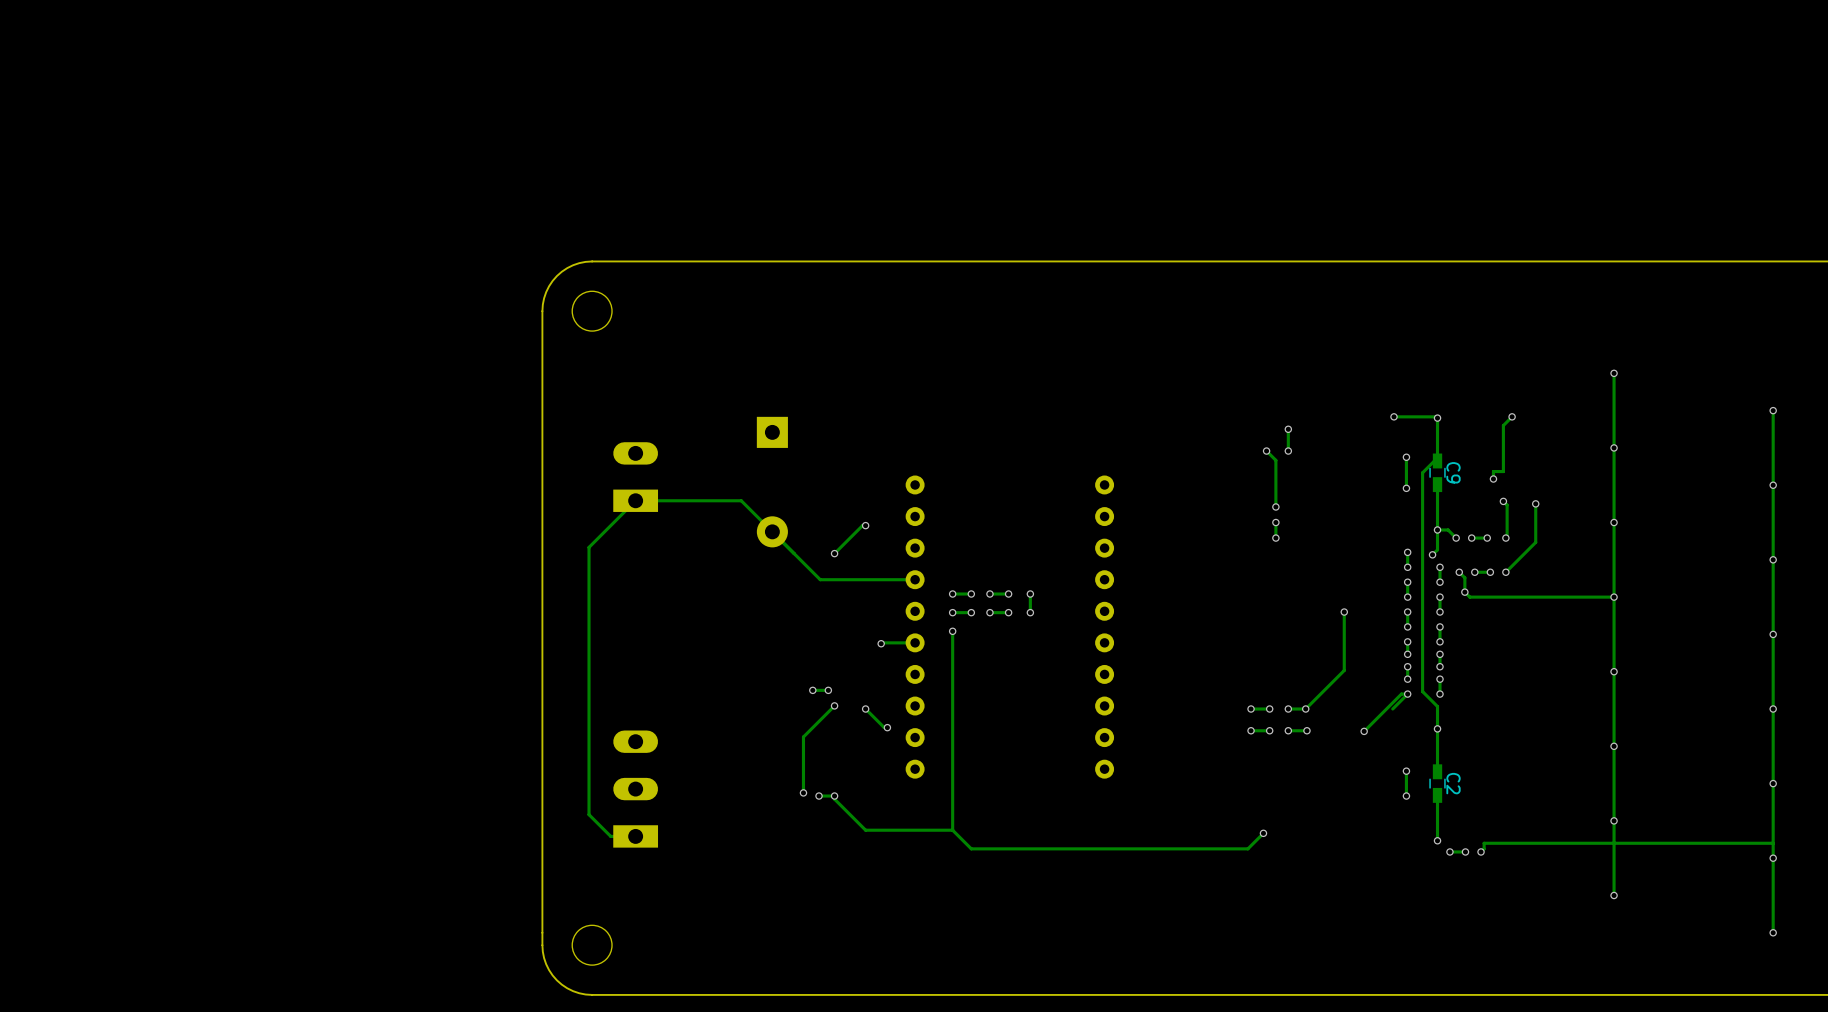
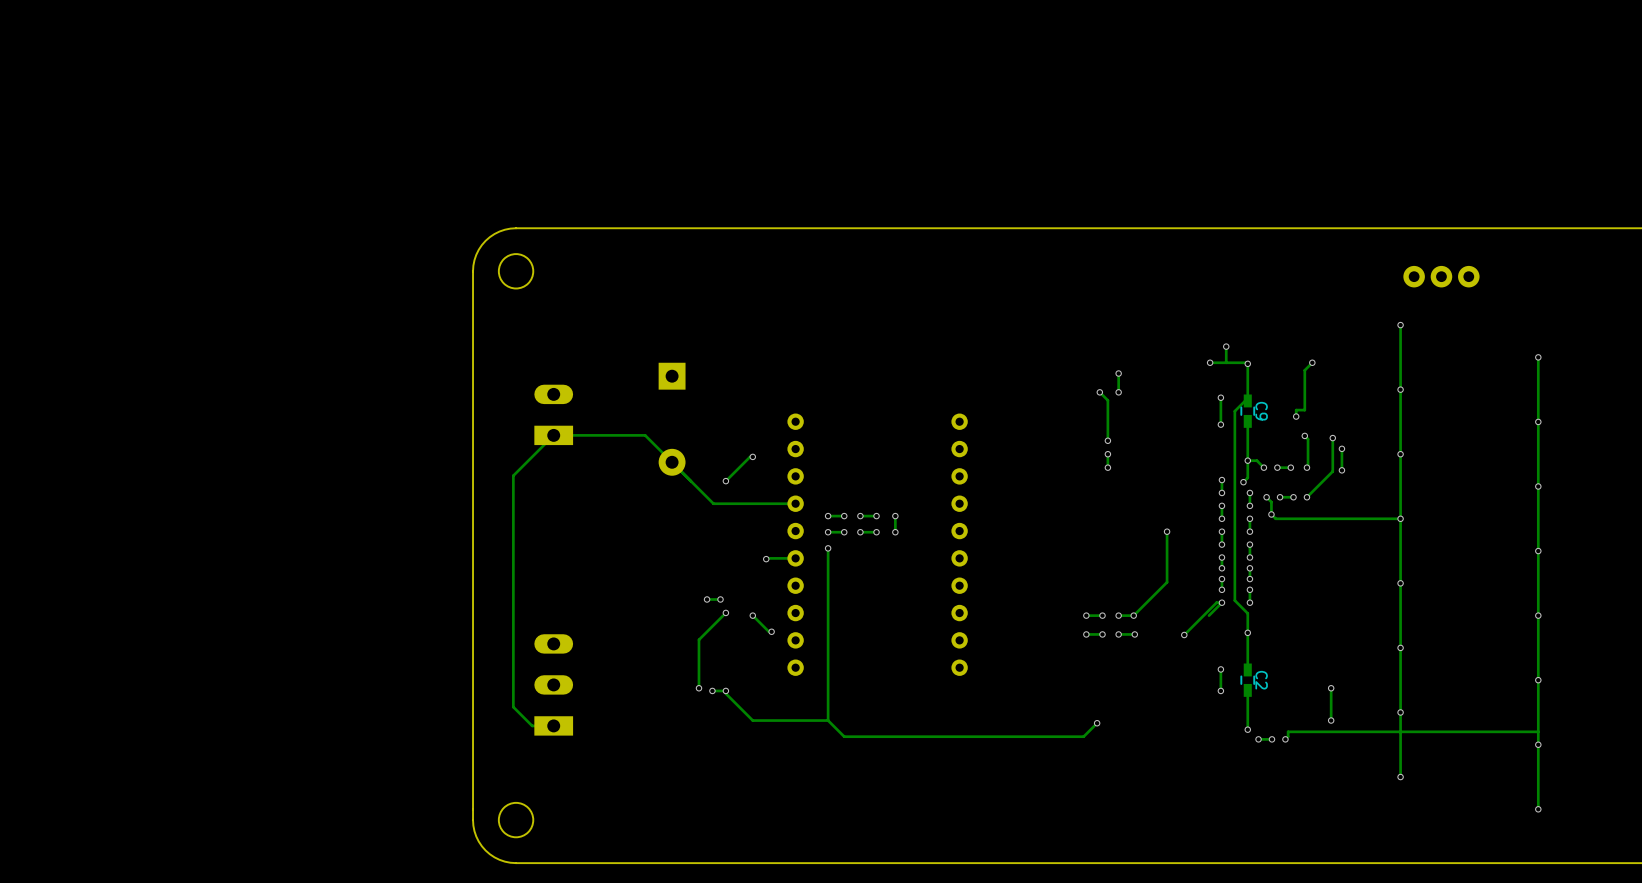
part: none -> (1441, 276)
track: none -> (1226, 346) (1226, 362)
via: none -> (1226, 346)
track: none -> (1341, 448) (1341, 470)
via: none -> (1341, 448)
via: none -> (1341, 470)
track: none -> (1331, 688) (1331, 720)
via: none -> (1331, 688)
via: none -> (1331, 720)

